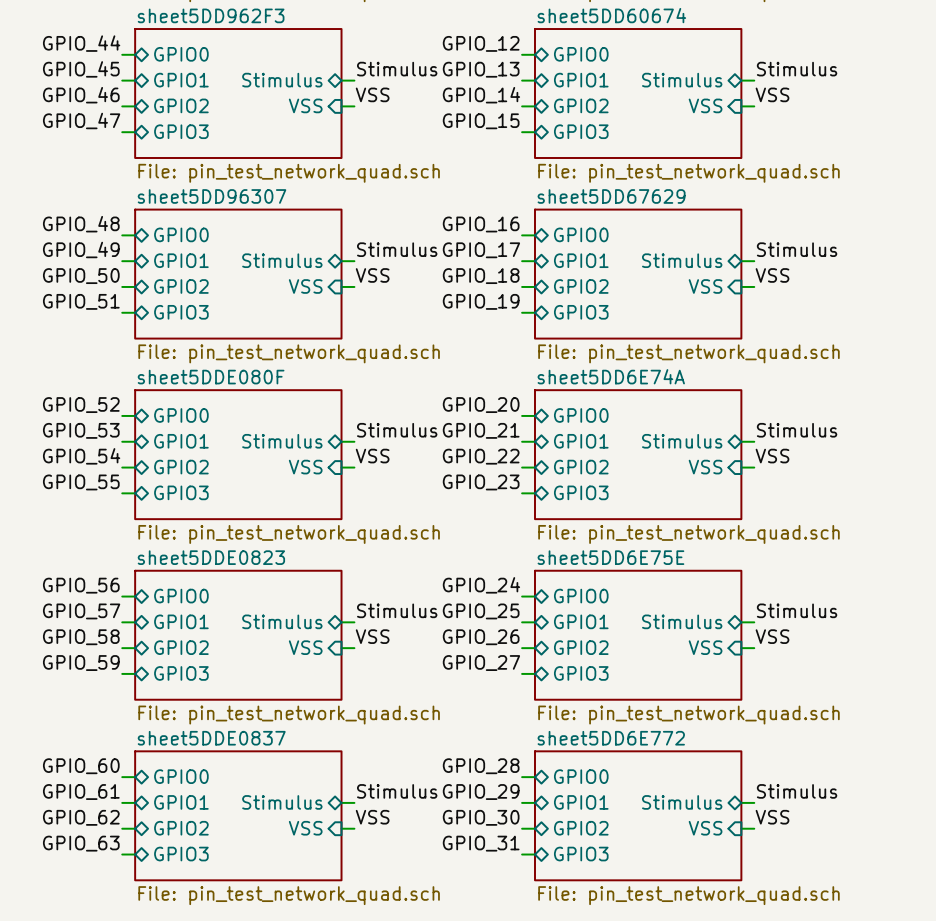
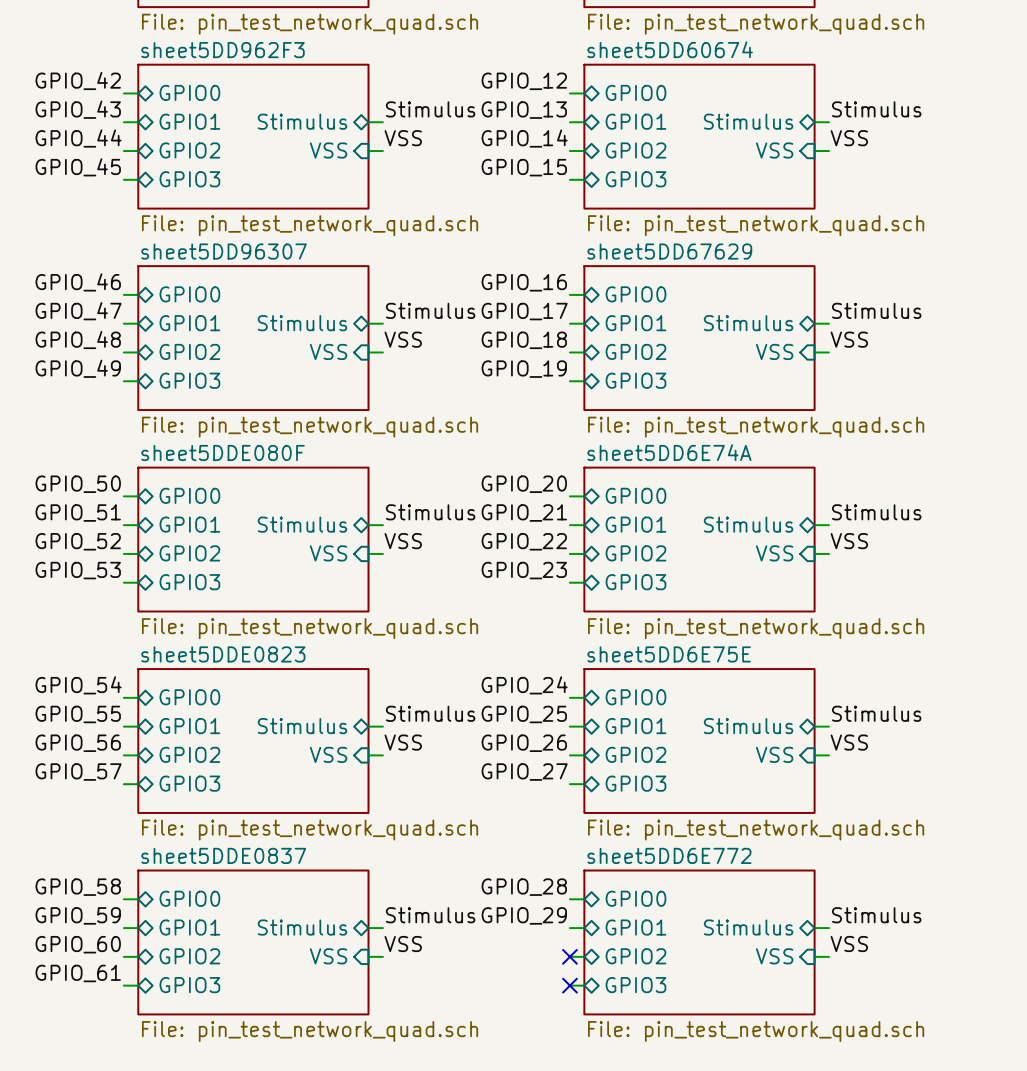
label: GPIO_44 (81, 43) -> GPIO_42 (78, 80)
label: GPIO_45 (81, 69) -> GPIO_43 (78, 109)
label: GPIO_46 (81, 95) -> GPIO_44 (78, 138)
label: GPIO_47 (81, 120) -> GPIO_45 (78, 167)
label: GPIO_48 (81, 224) -> GPIO_46 (78, 282)
label: GPIO_49 (81, 249) -> GPIO_47 (78, 311)
label: GPIO_50 (81, 276) -> GPIO_48 (78, 339)
label: GPIO_51 (81, 301) -> GPIO_49 (78, 368)
label: GPIO_52 (81, 405) -> GPIO_50 (78, 484)
label: GPIO_53 (81, 430) -> GPIO_51 (78, 513)
label: GPIO_54 (81, 456) -> GPIO_52 (78, 541)
label: GPIO_55 (81, 482) -> GPIO_53 (78, 570)
label: GPIO_56 (81, 585) -> GPIO_54 (78, 685)
label: GPIO_57 (81, 611) -> GPIO_55 (78, 714)
label: GPIO_58 (81, 637) -> GPIO_56 (78, 743)
label: GPIO_59 (81, 663) -> GPIO_57 (78, 772)
label: GPIO_60 (81, 766) -> GPIO_58 (78, 887)
label: GPIO_61 (81, 792) -> GPIO_59 (78, 915)
label: GPIO_62 (81, 817) -> GPIO_60 (78, 944)
label: GPIO_30 (481, 817) -> none
no-connect mark: none -> (569, 956)
label: GPIO_63 (81, 843) -> GPIO_61 (78, 973)
label: GPIO_31 (481, 843) -> none
no-connect mark: none -> (569, 985)

